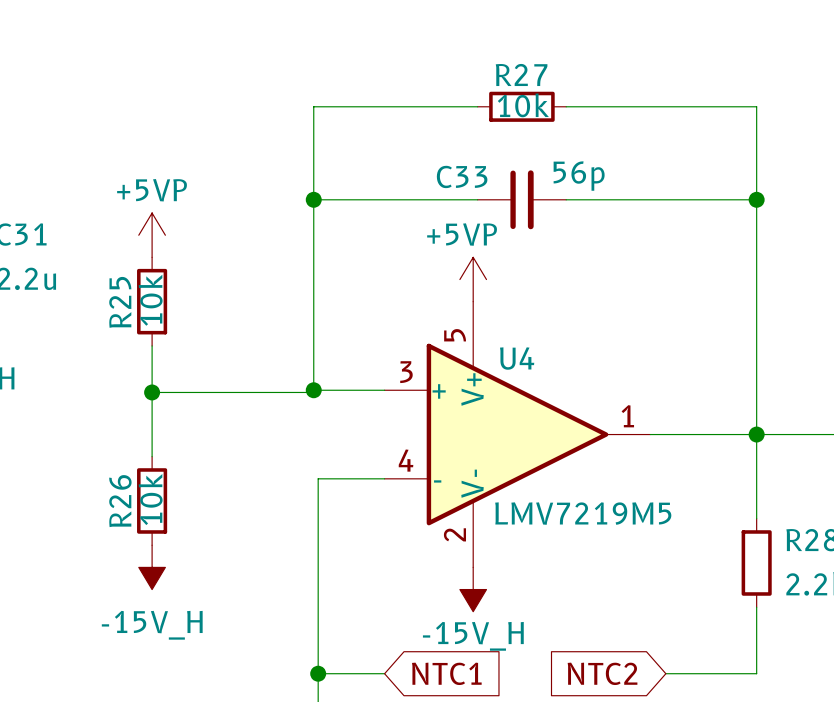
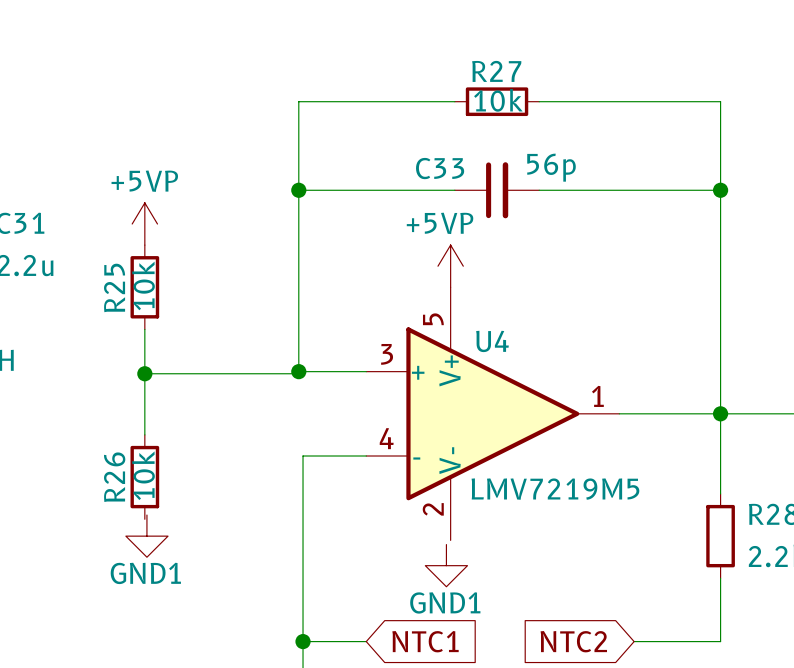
power symbol: -15V_H (152, 567) -> GND1 (146, 536)
power symbol: -15V_H (473, 589) -> GND1 (446, 565)

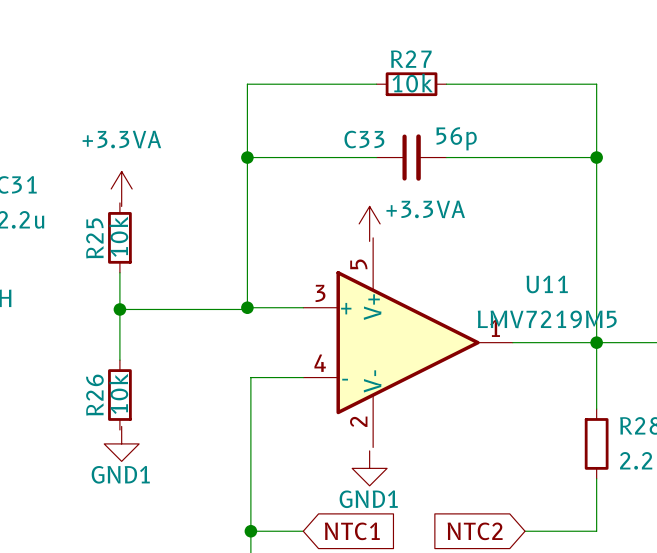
power symbol: +5VP (144, 224) -> +3.3VA (121, 188)
power symbol: +5VP (450, 266) -> +3.3VA (369, 223)
U4 name: U4 (492, 341) -> U11 (547, 284)
U4 value position: LMV7219M5 (555, 489) -> LMV7219M5 (547, 319)

